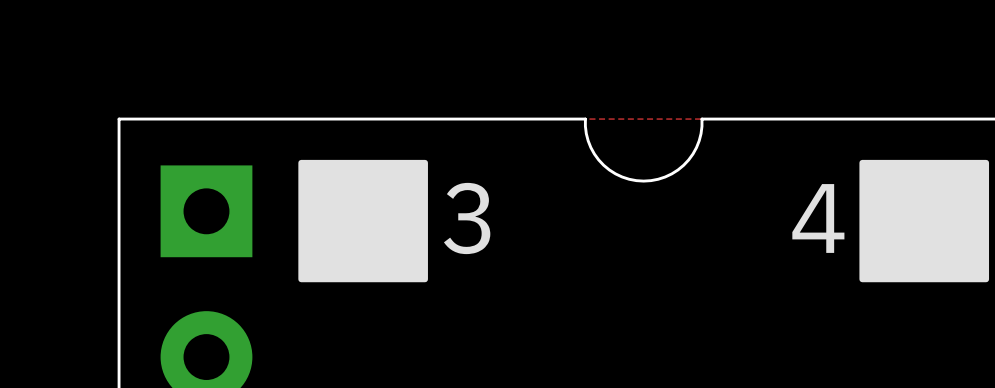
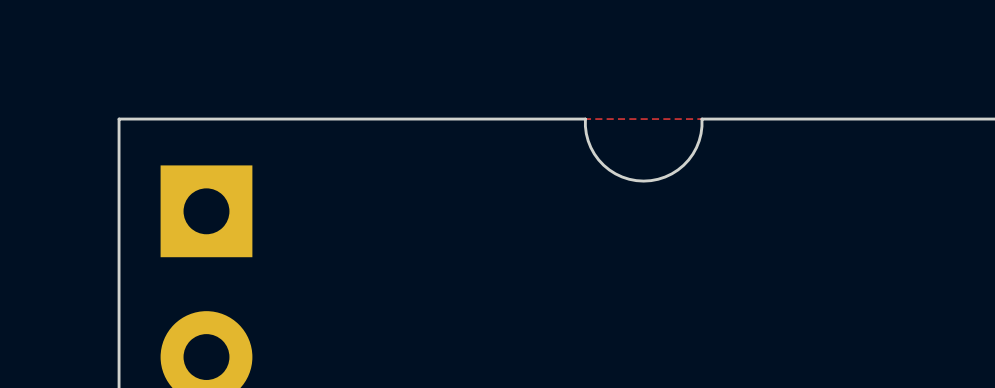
drawing: [298, 159, 428, 283] -> none
drawing: [859, 159, 990, 283] -> none
text: 3 (467, 218) -> none
text: 4 (818, 218) -> none

